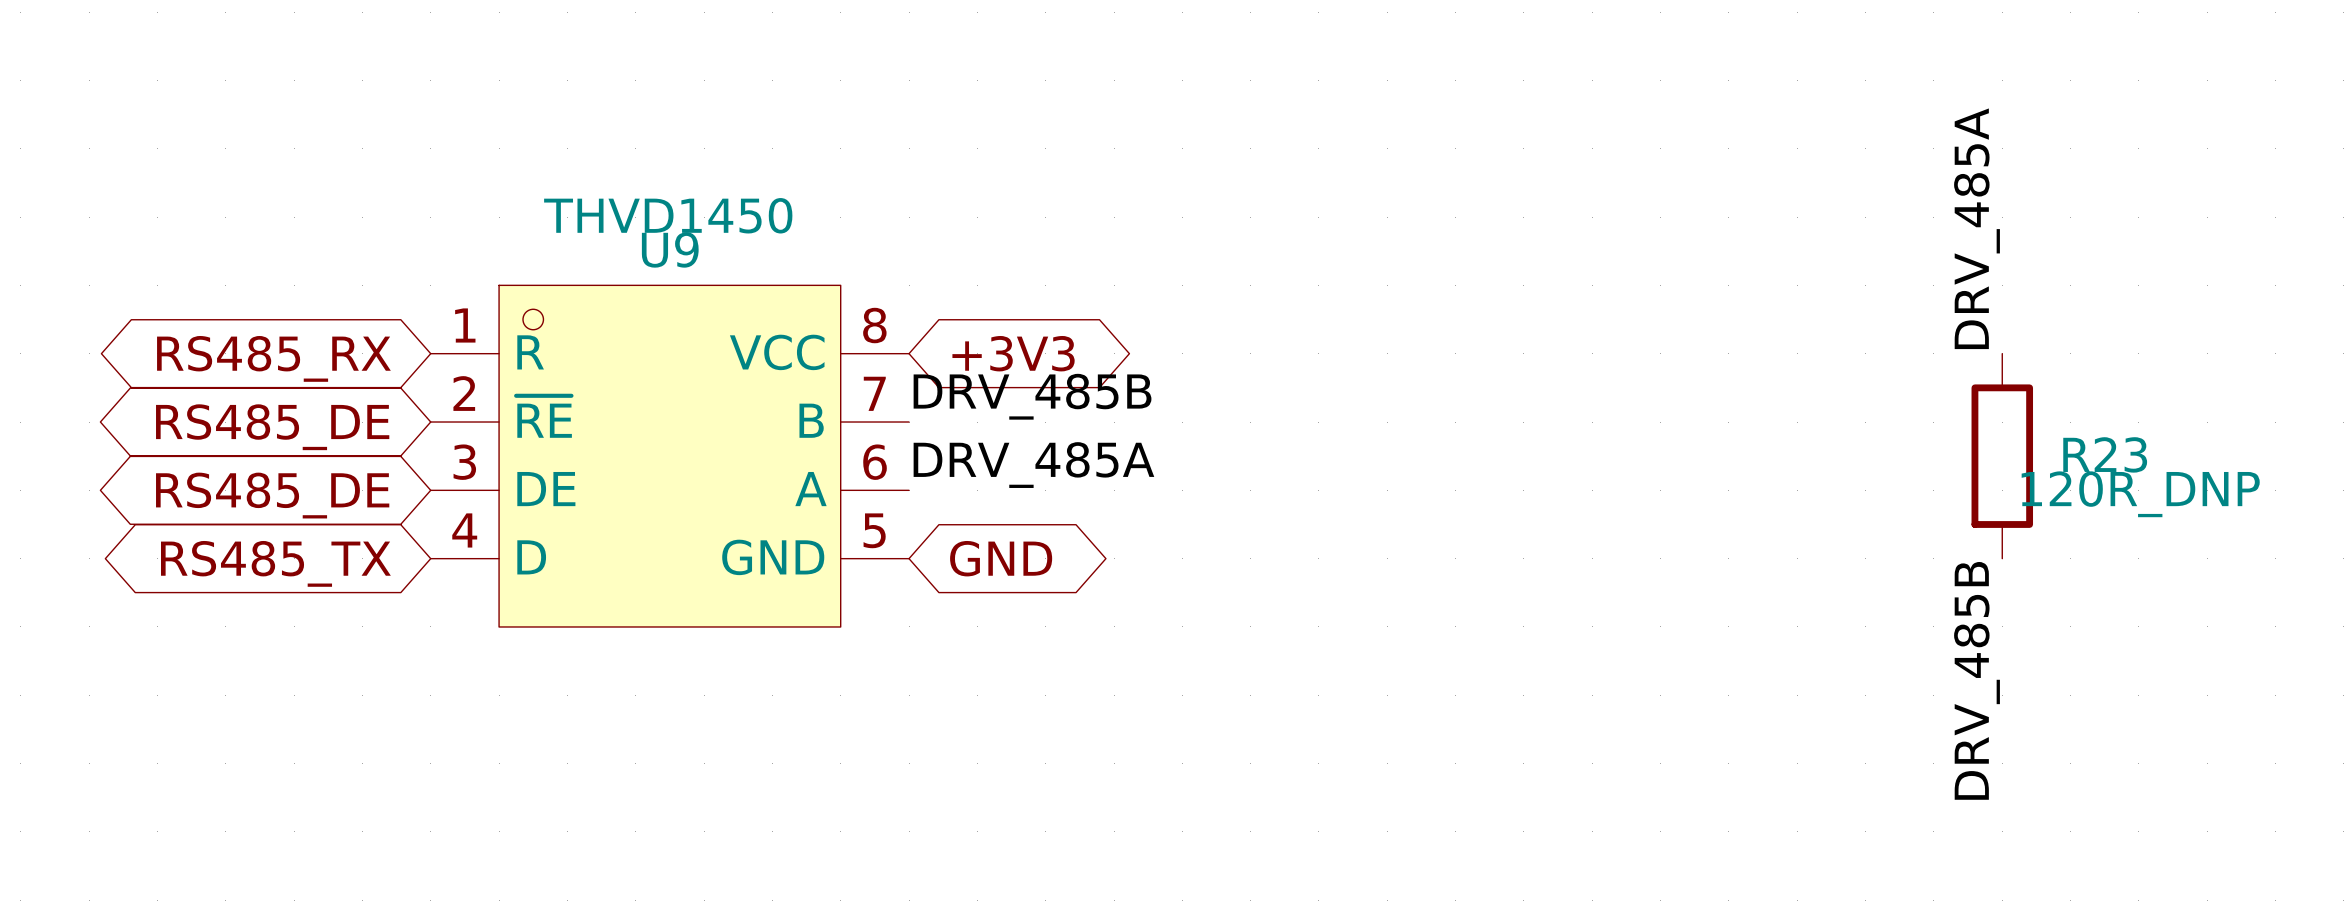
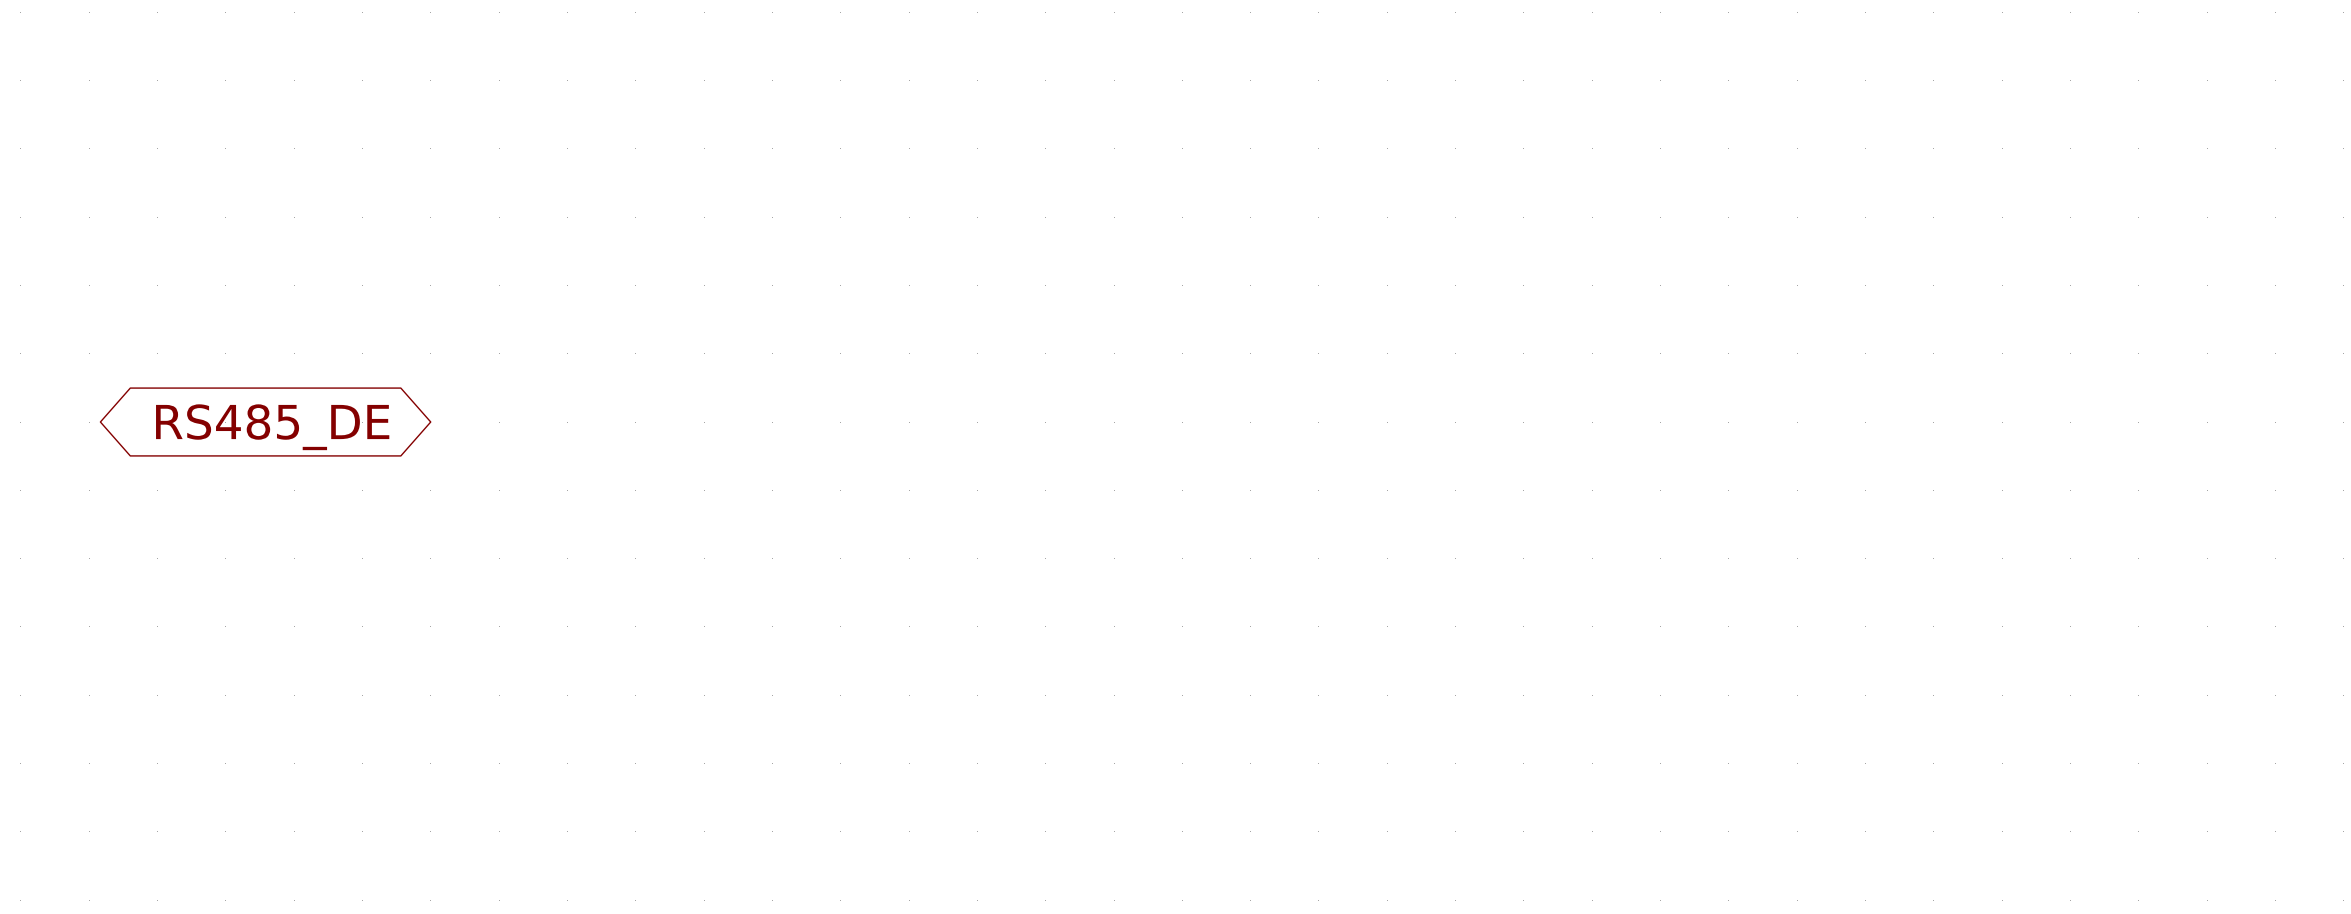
label: DRV_485A (1977, 228) -> none
global label: +3V3 (1013, 353) -> none
global label: RS485_RX (273, 358) -> none
label: DRV_485B (1032, 396) -> none
U9: THVD1450 (669, 456) -> none
R23: 120R_DNP (2002, 456) -> none
label: DRV_485A (1033, 465) -> none
global label: RS485_DE (272, 495) -> none
global label: GND (1001, 558) -> none
global label: RS485_TX (275, 563) -> none
label: DRV_485B (1977, 680) -> none

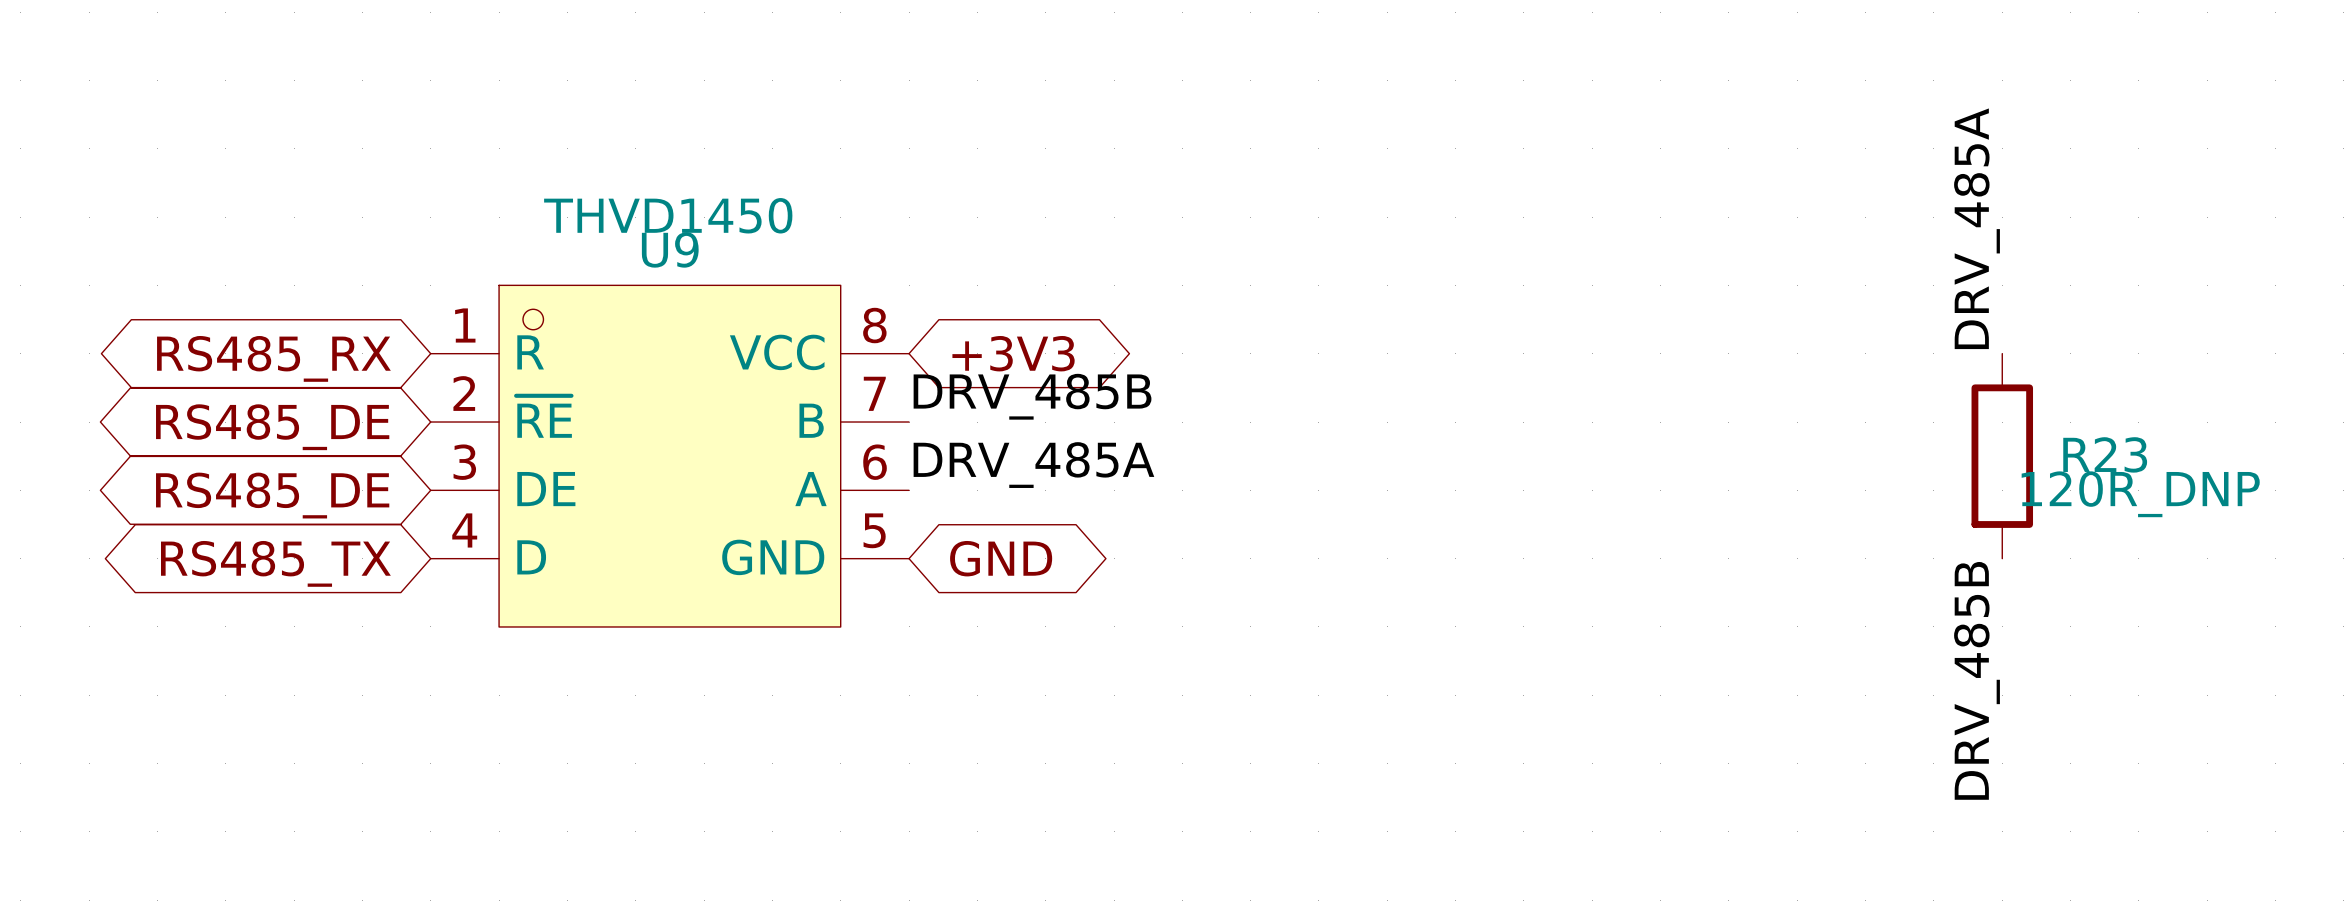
label: none -> DRV_485A (1977, 228)
global label: none -> +3V3 (1013, 353)
global label: none -> RS485_RX (273, 358)
label: none -> DRV_485B (1032, 396)
U9: none -> THVD1450 (669, 456)
R23: none -> 120R_DNP (2002, 456)
label: none -> DRV_485A (1033, 465)
global label: none -> RS485_DE (272, 495)
global label: none -> GND (1001, 558)
global label: none -> RS485_TX (275, 563)
label: none -> DRV_485B (1977, 680)

